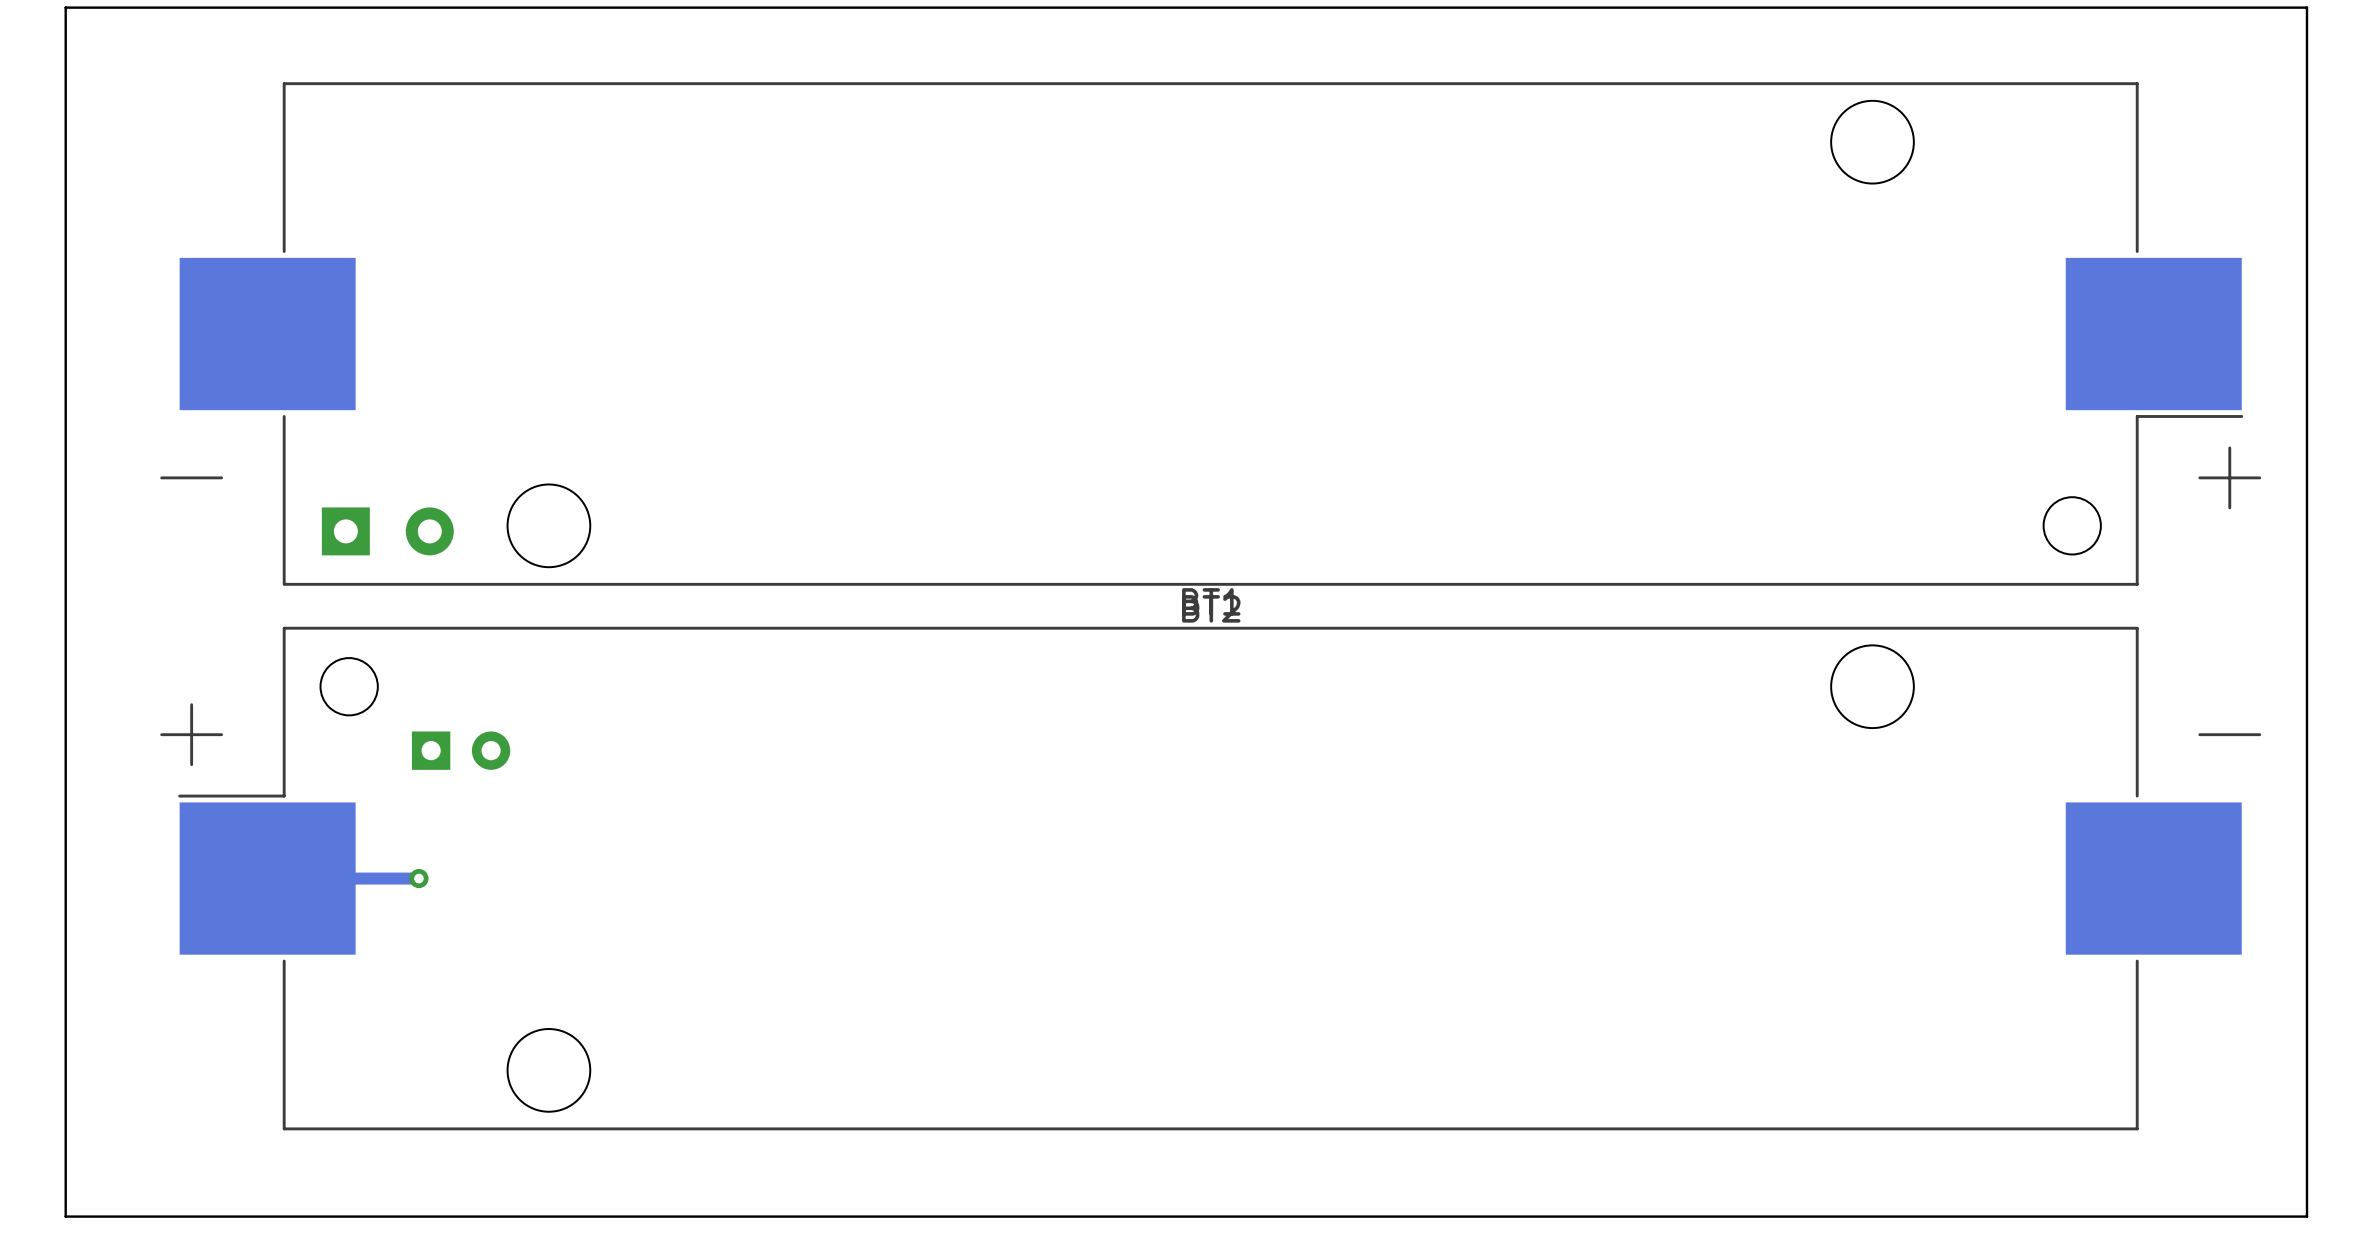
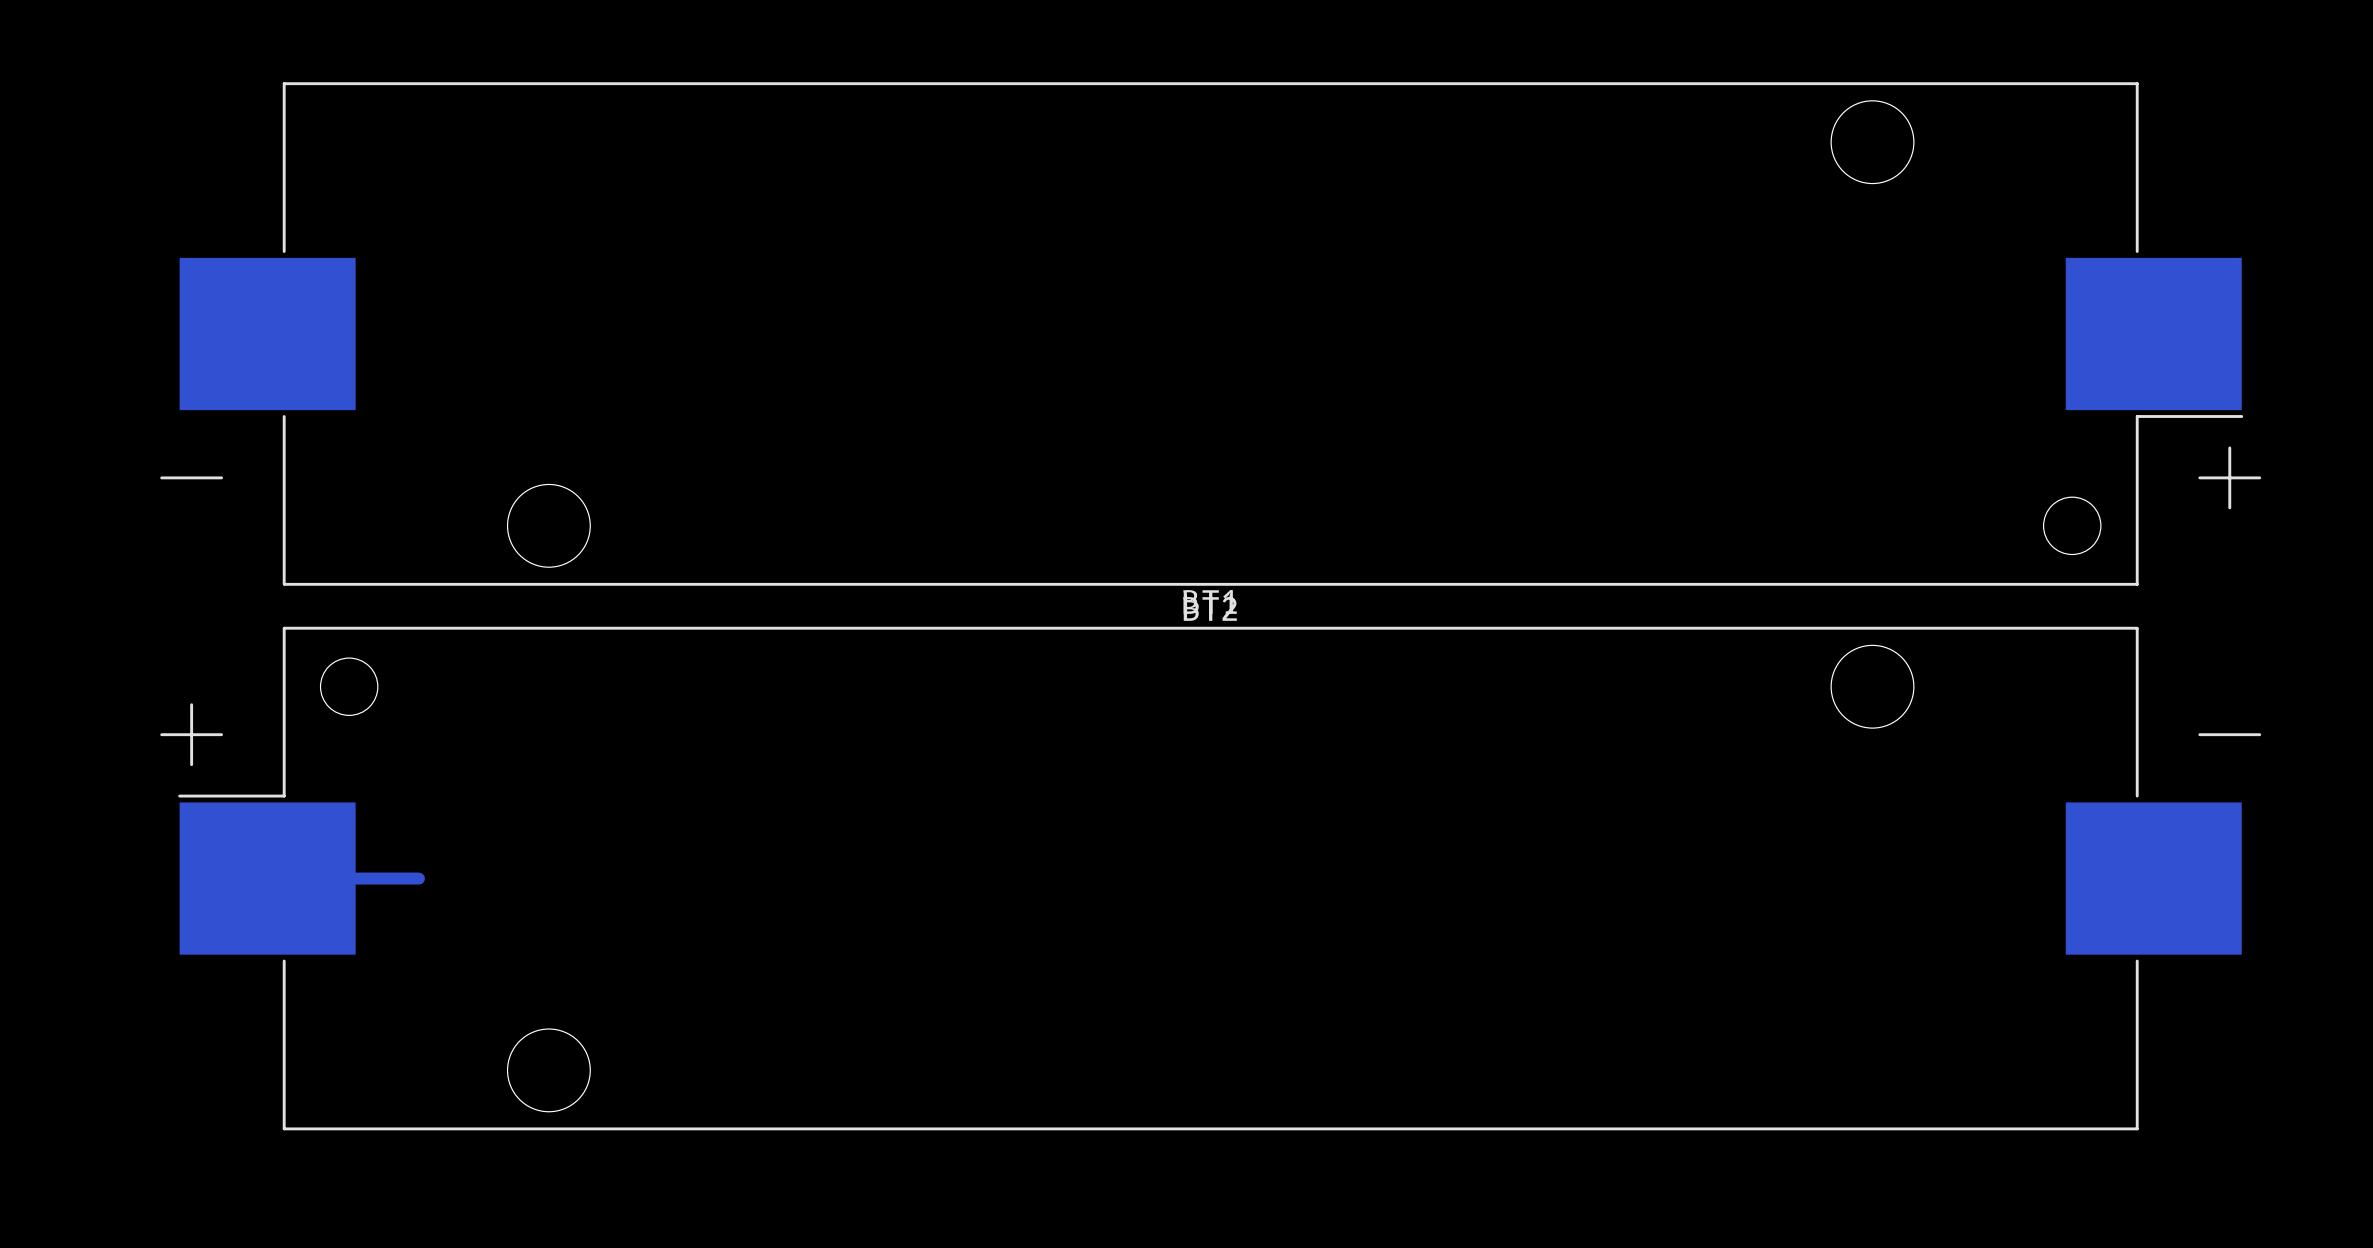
board edge: (2306, 7) (65, 7) (65, 1216) (2306, 1216) (2306, 7) -> none
part: (387, 531) -> none
part: (461, 750) -> none
via: (418, 878) -> none

